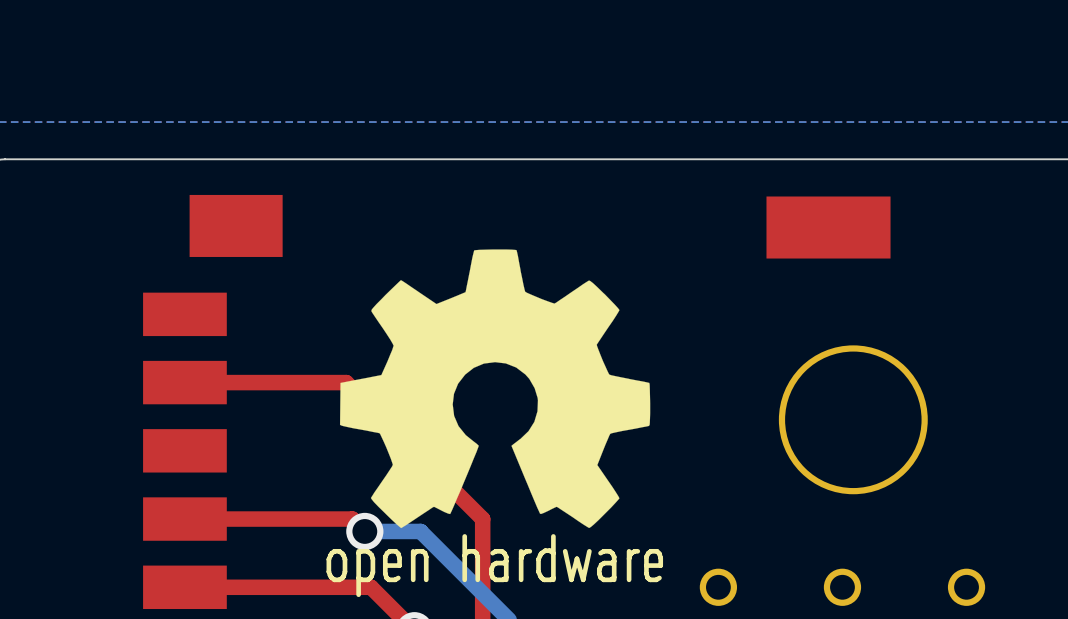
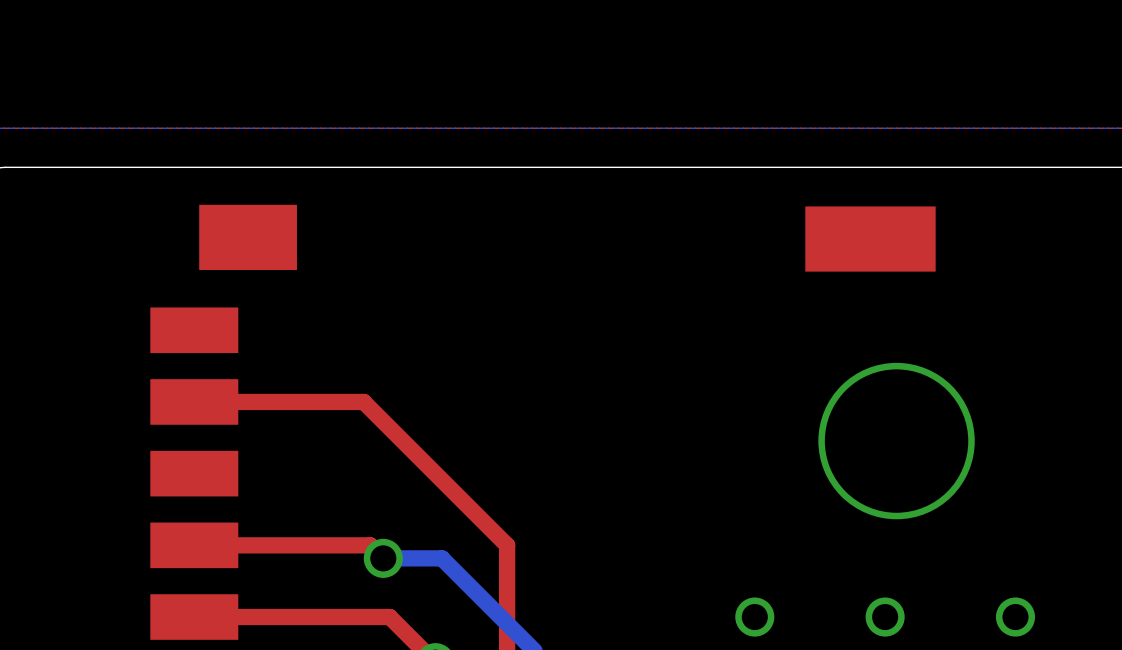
drawing: [326, 249, 664, 598] -> none

